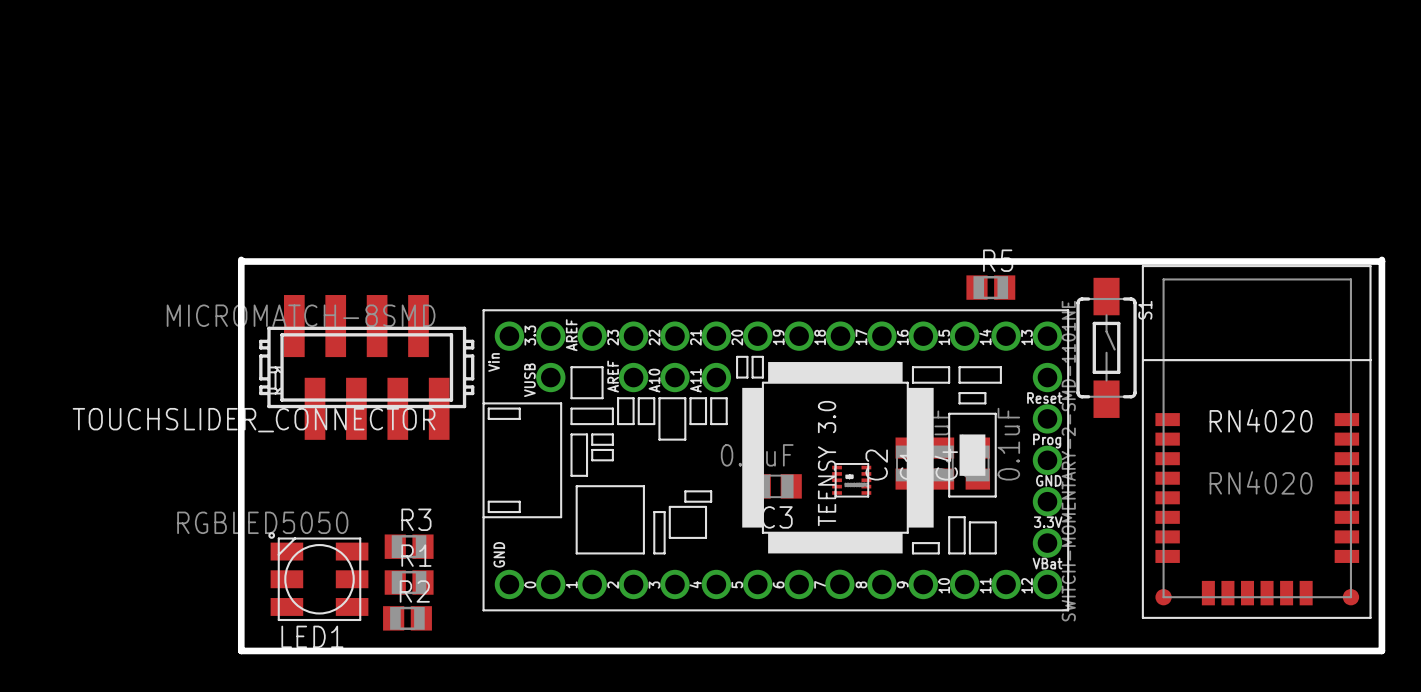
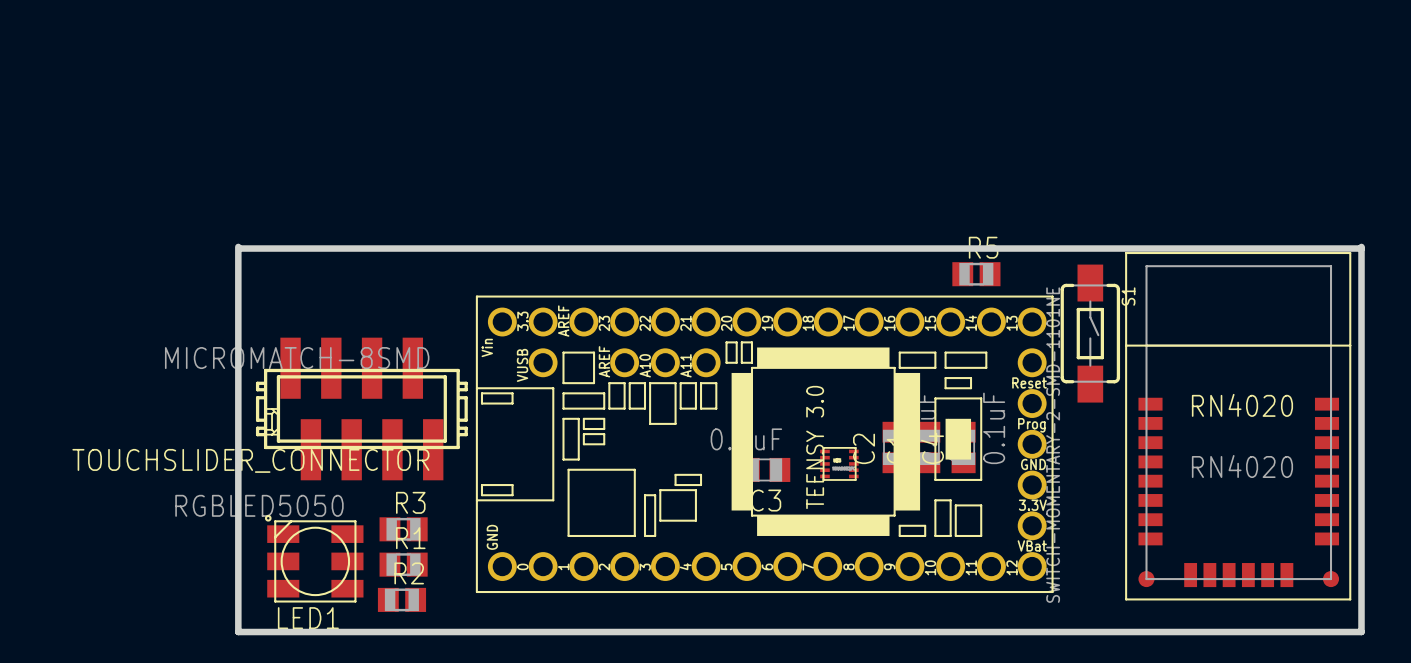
TOUCHSLIDER_CONNECTOR position: (366, 367) -> (361, 408)

